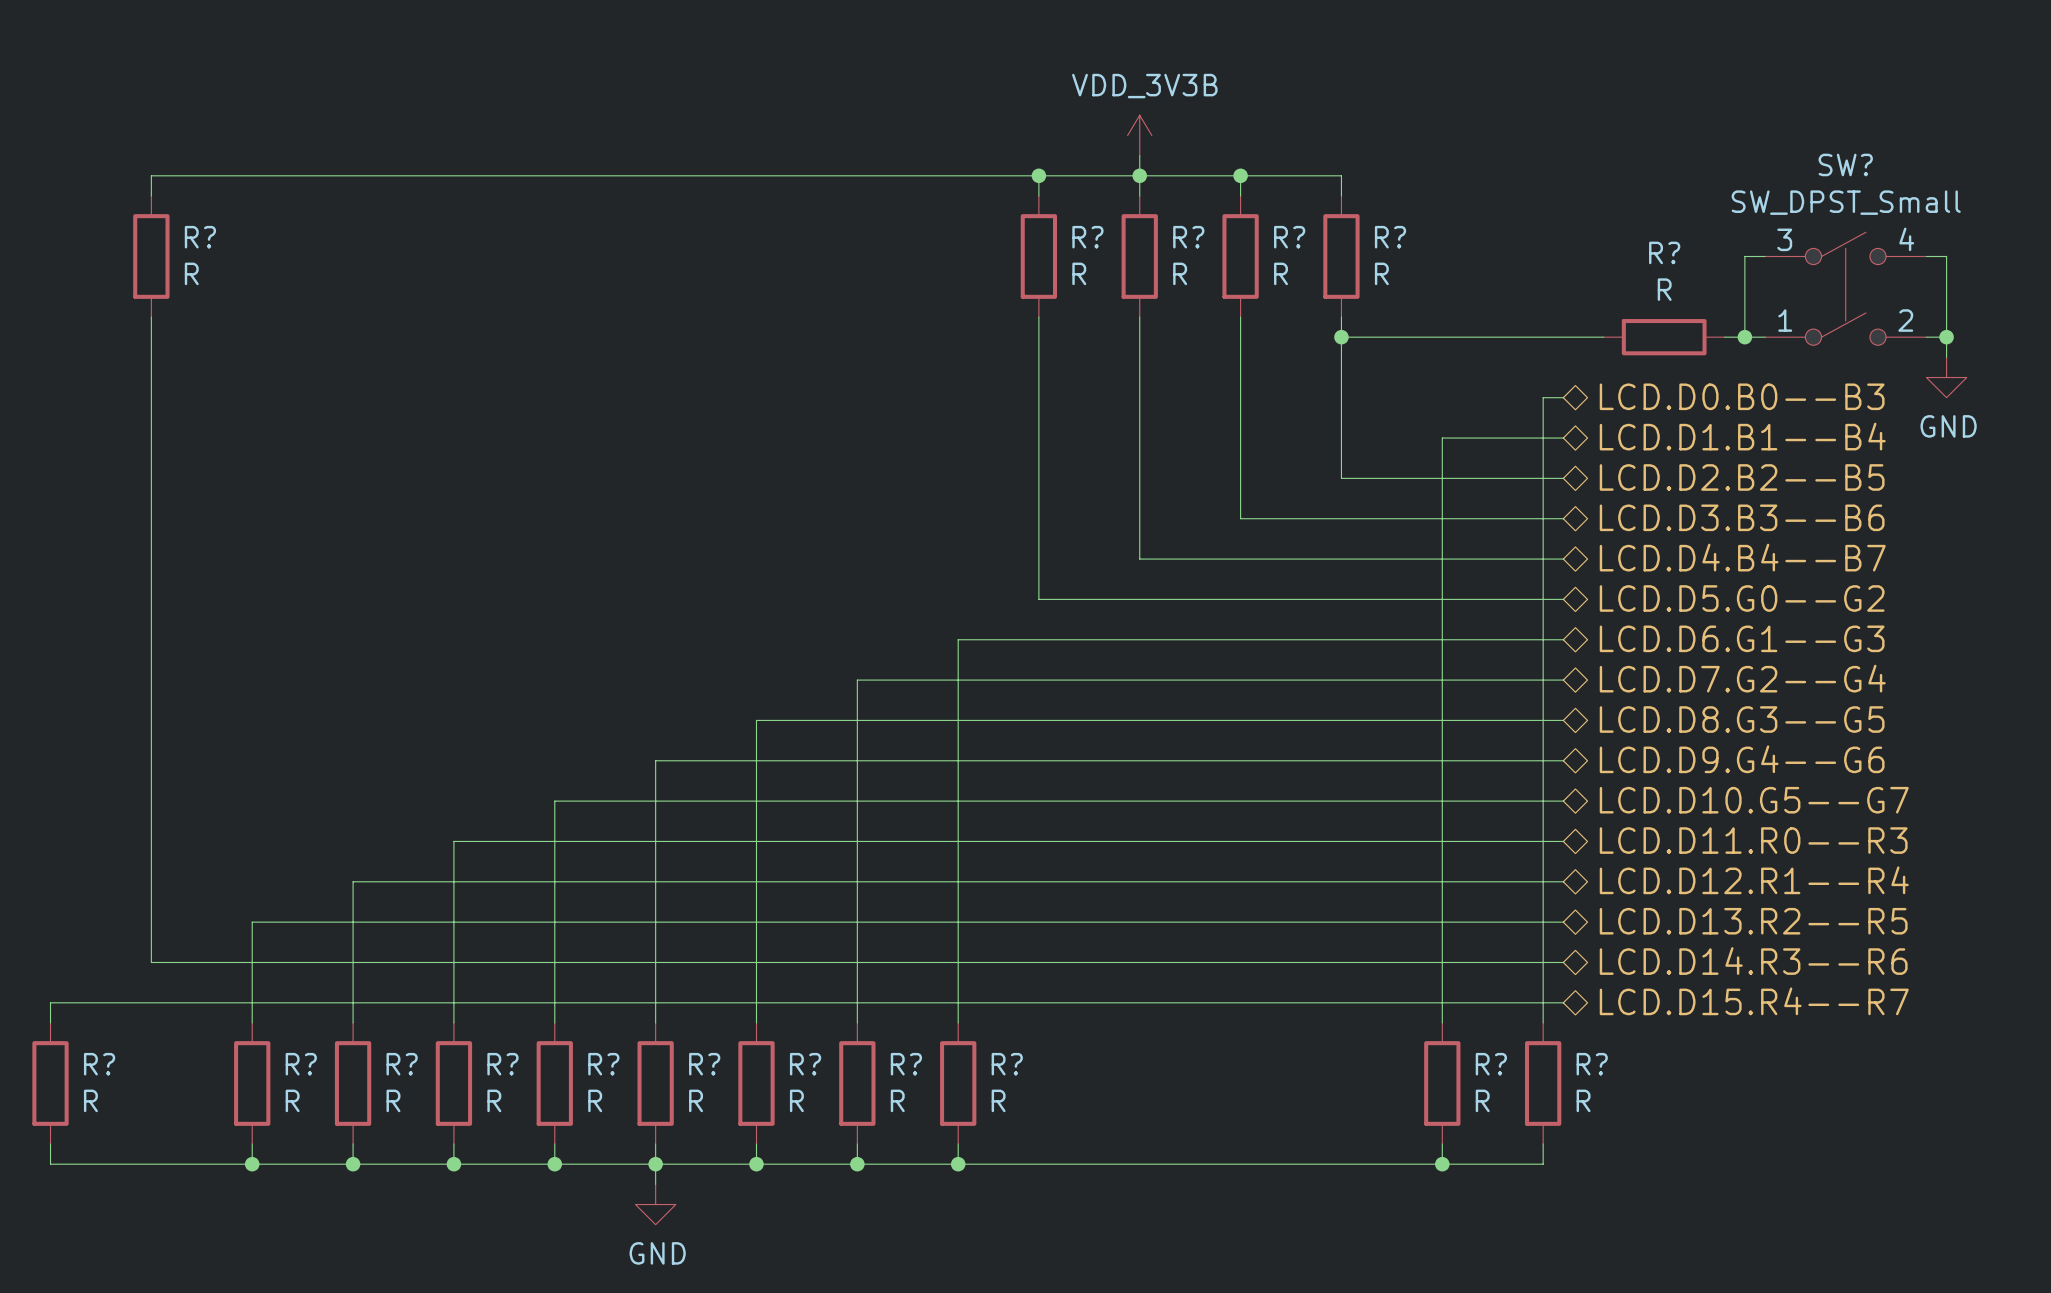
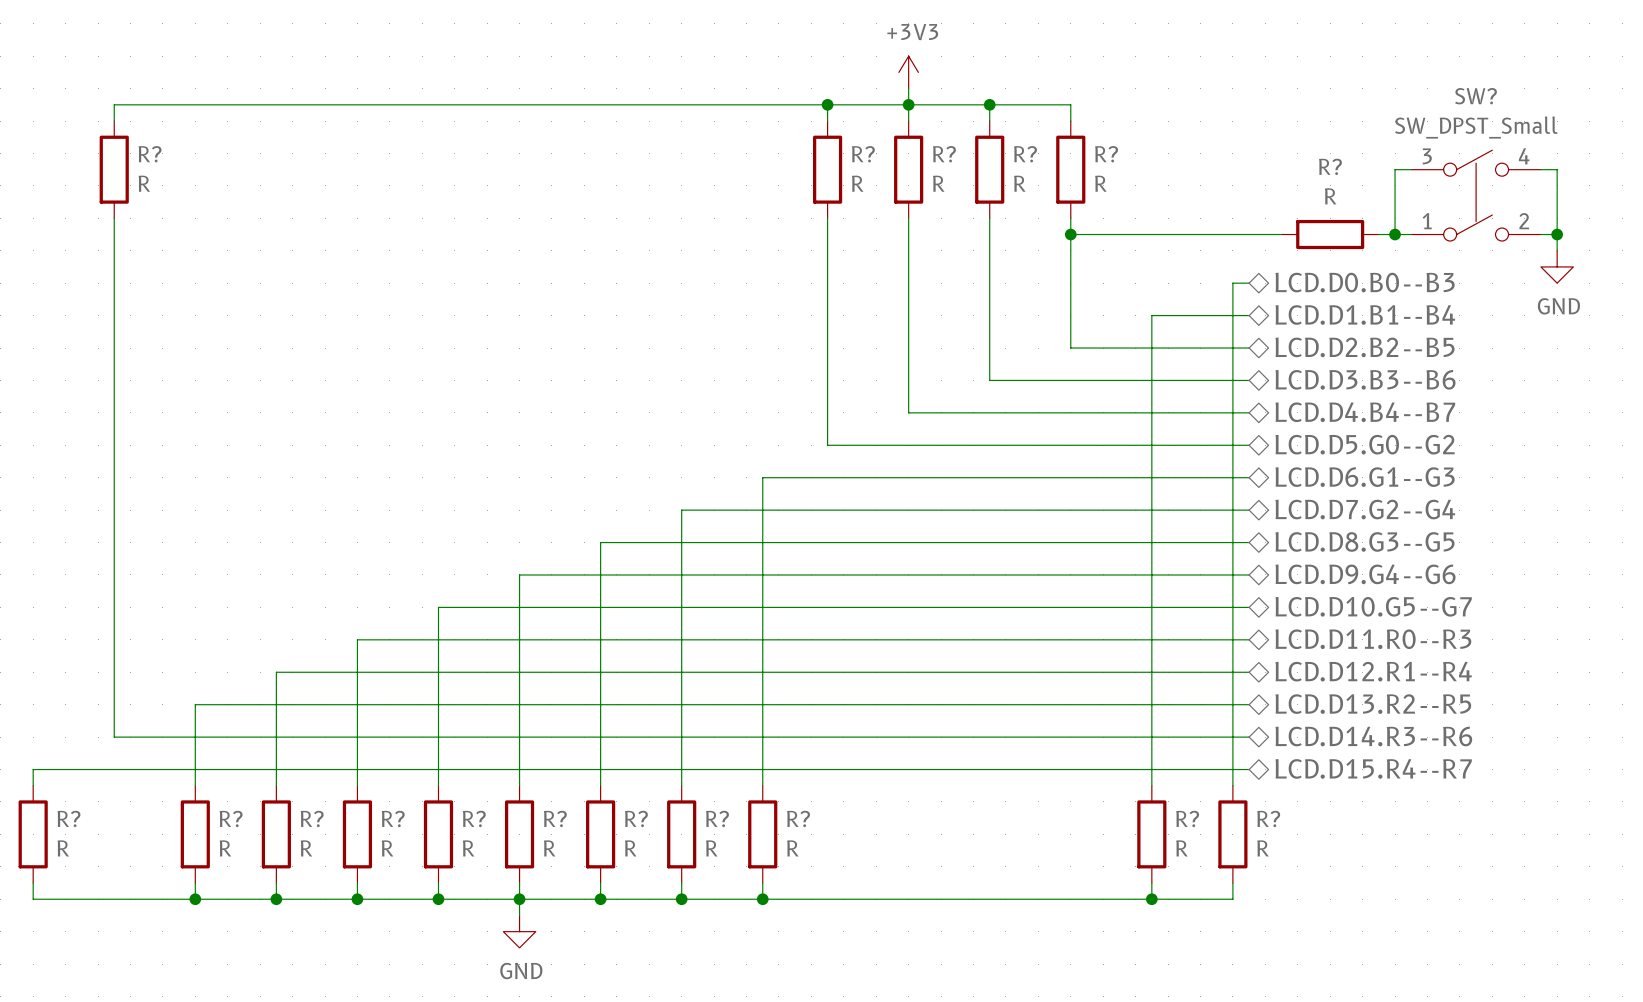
power symbol: VDD_3V3B (1139, 135) -> +3V3 (908, 72)

